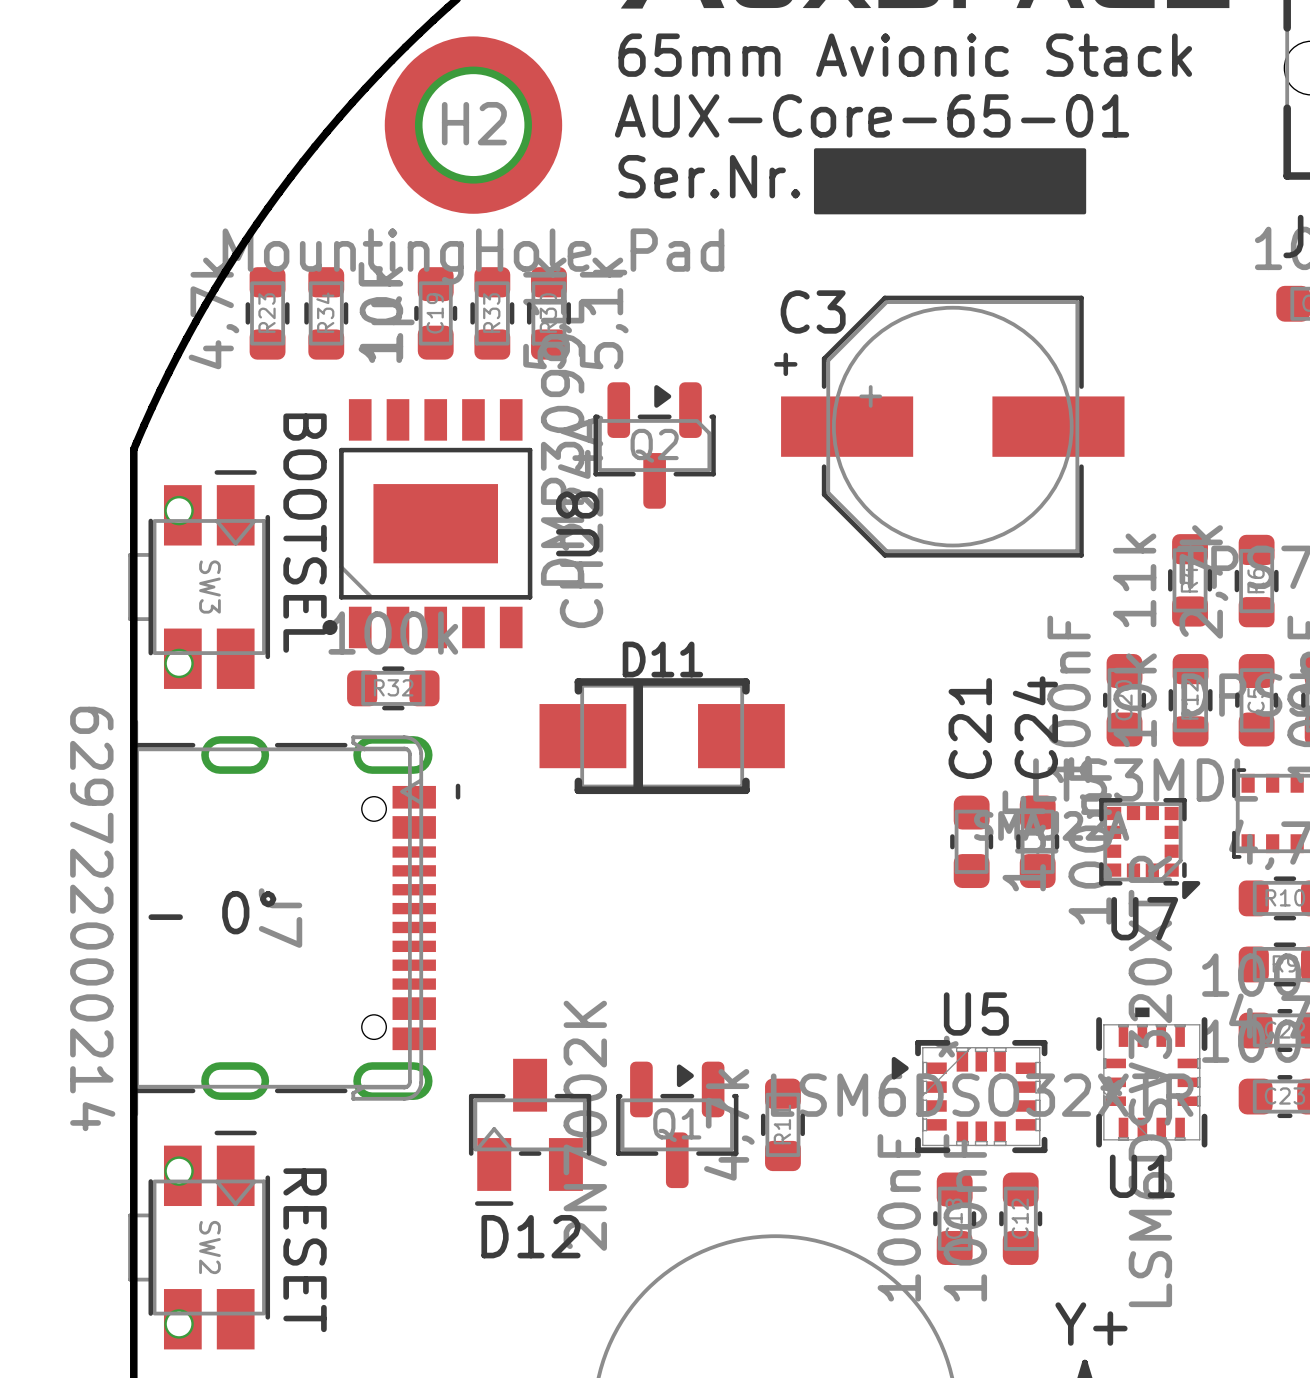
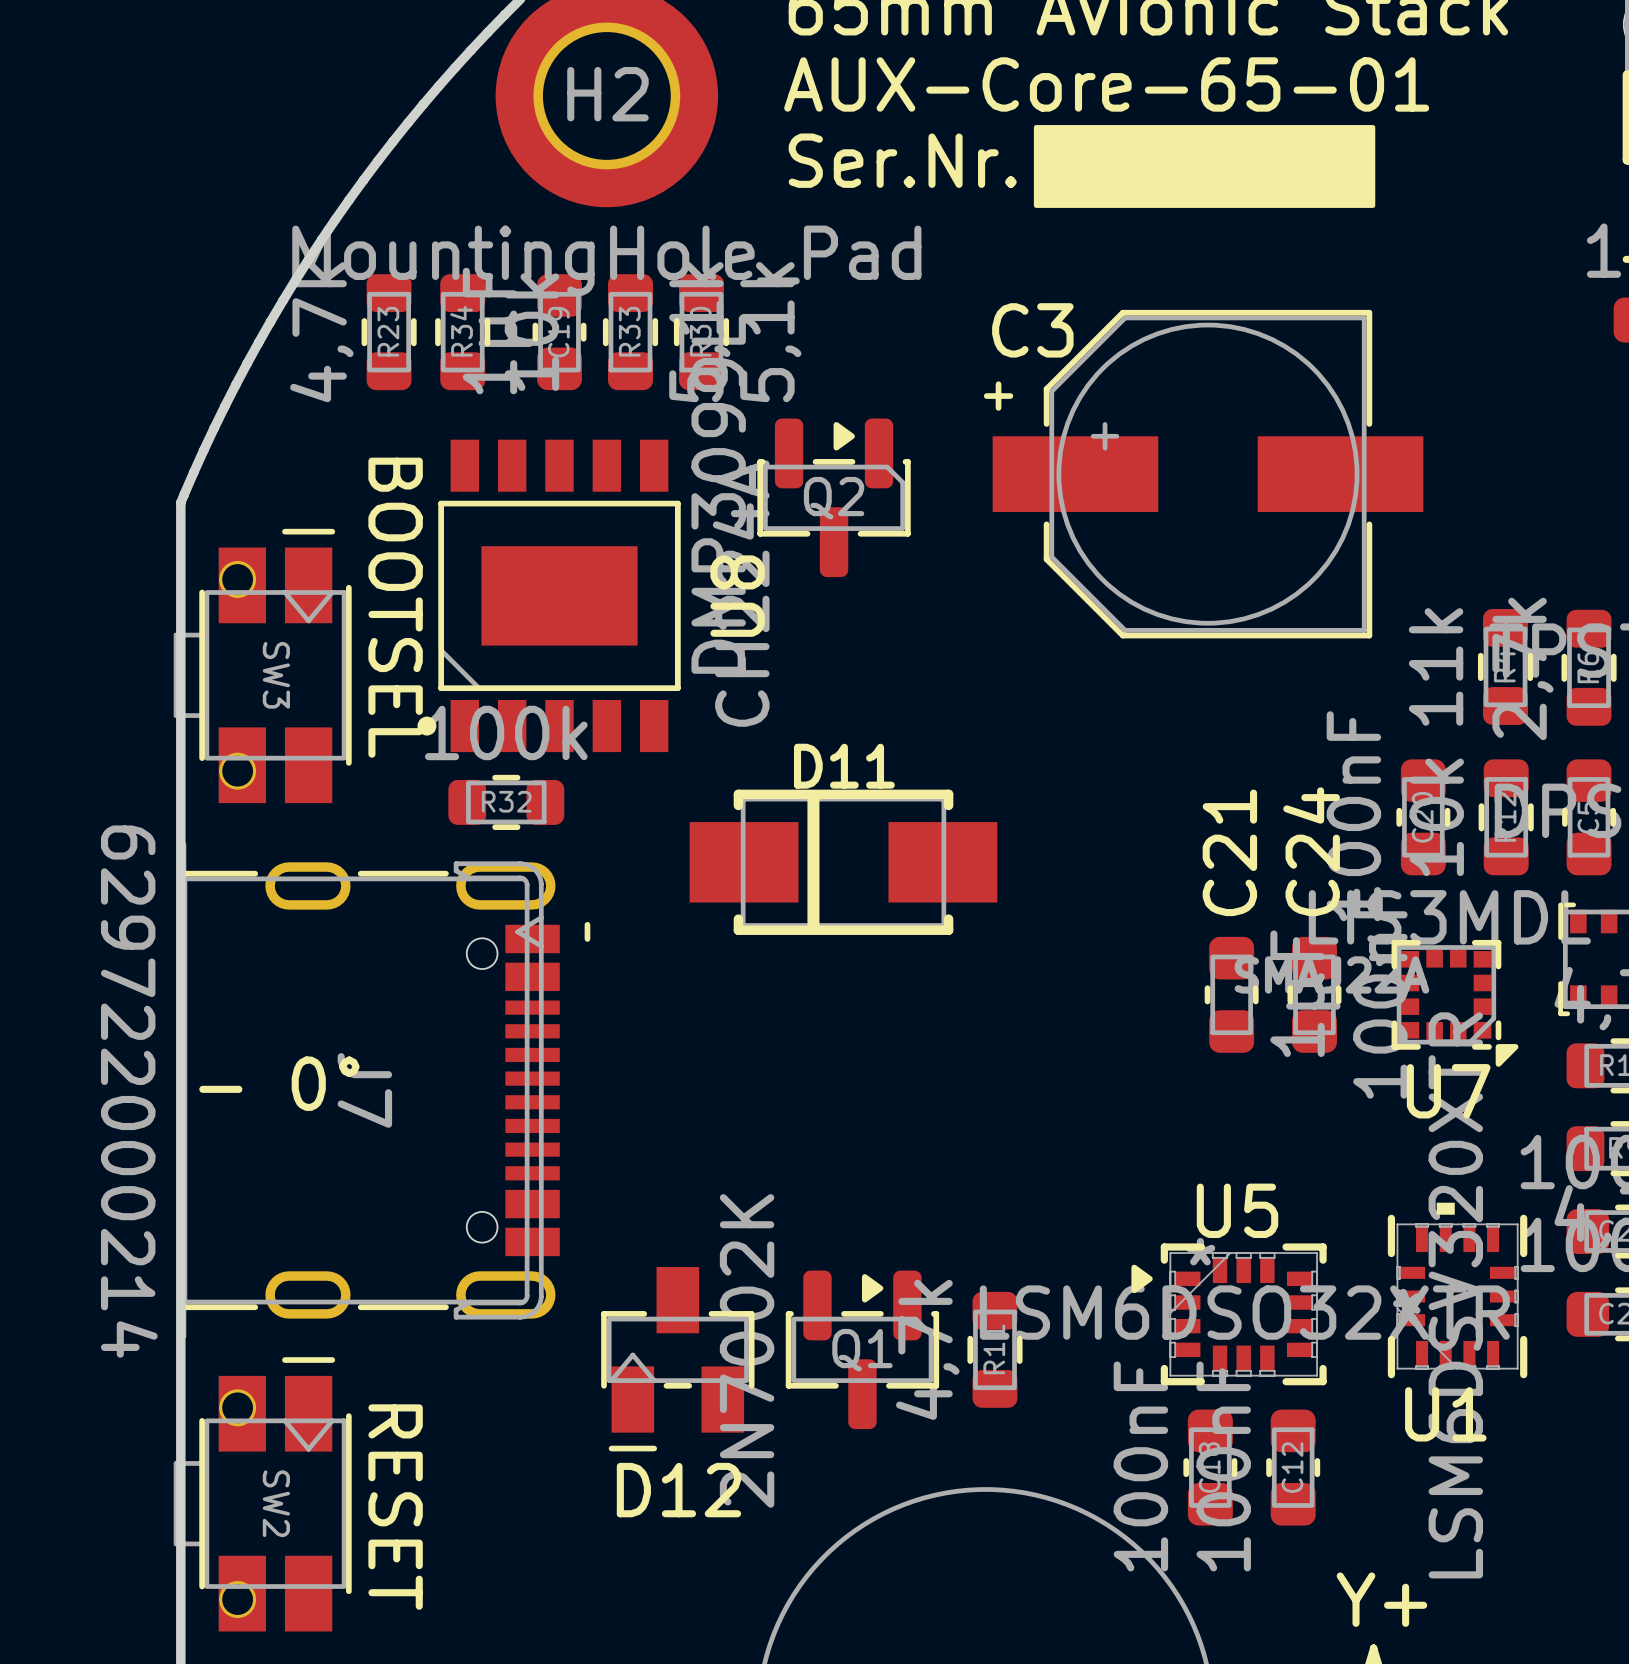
R23 position: (267, 313) -> (389, 332)
R34 position: (326, 313) -> (462, 332)

